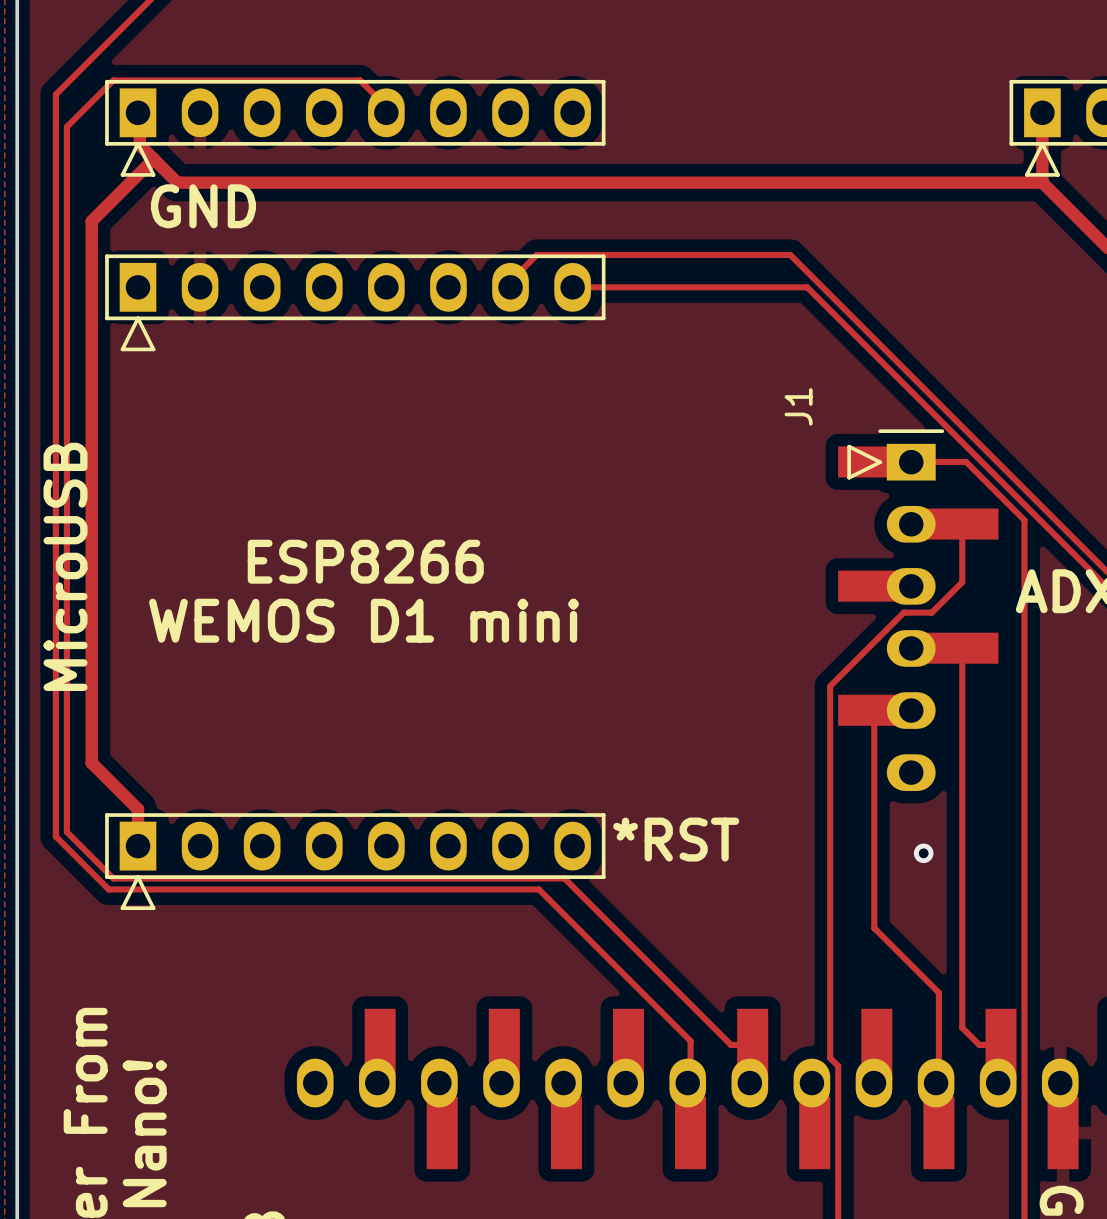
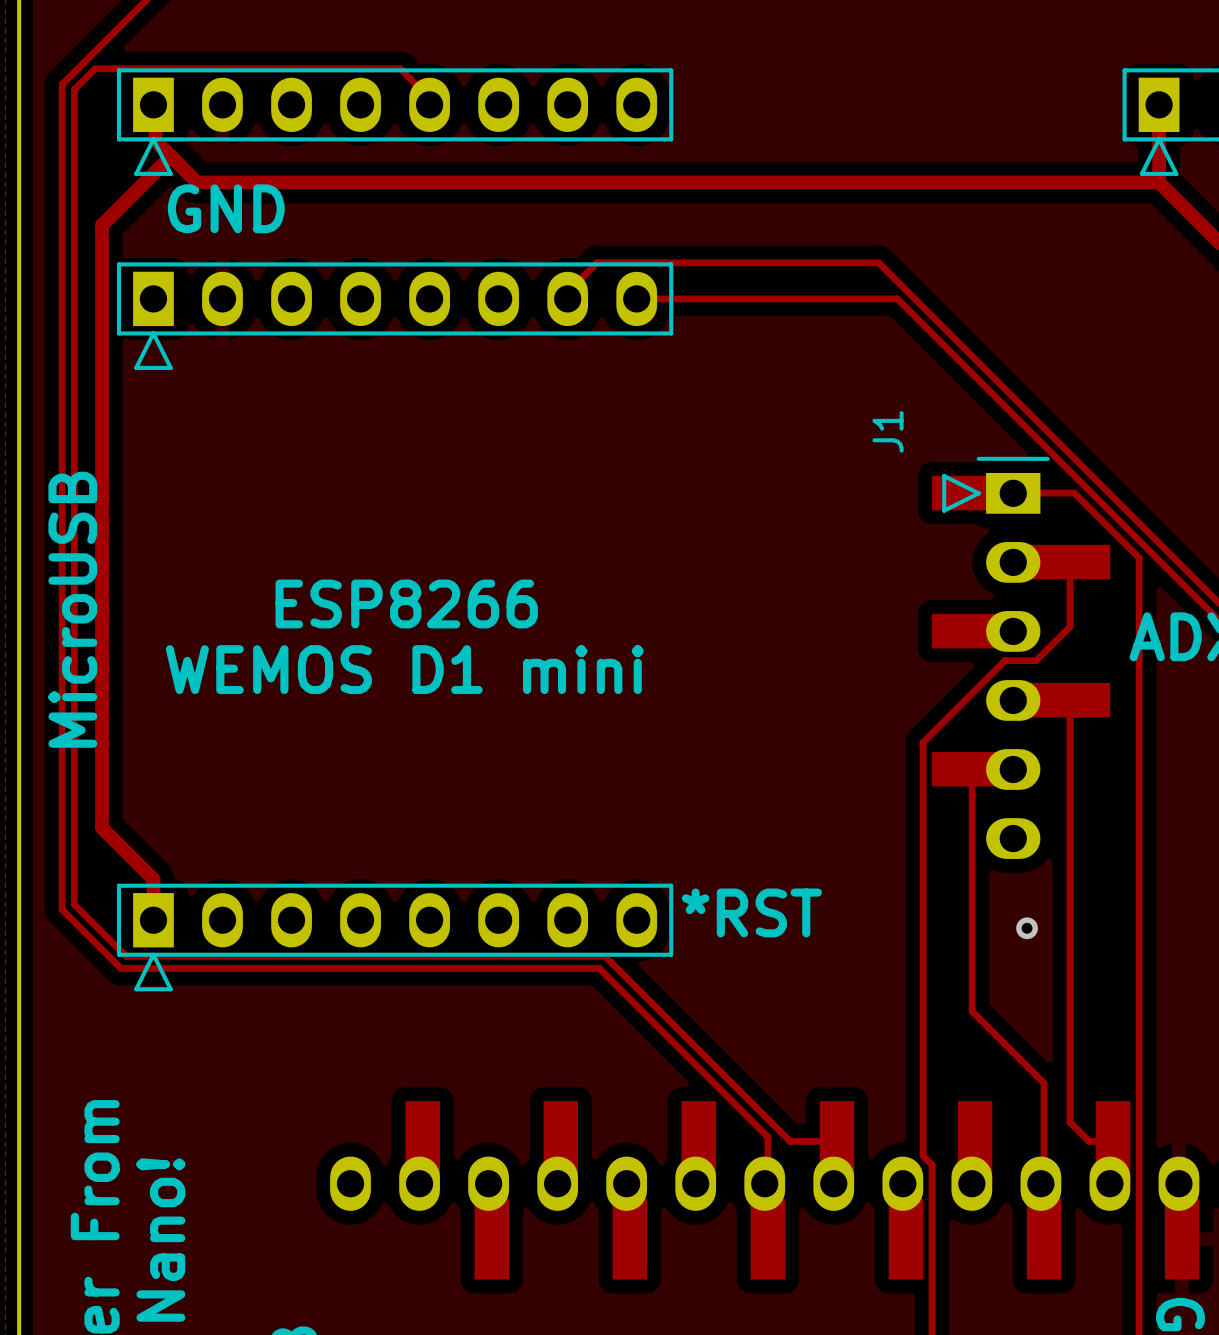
track: (113, 80) (66, 126) -> (126, 68) (95, 68) (74, 89) (74, 120)
track: (544, 878) (564, 878) (731, 1044) -> (605, 956) (790, 1141) (812, 1141)

